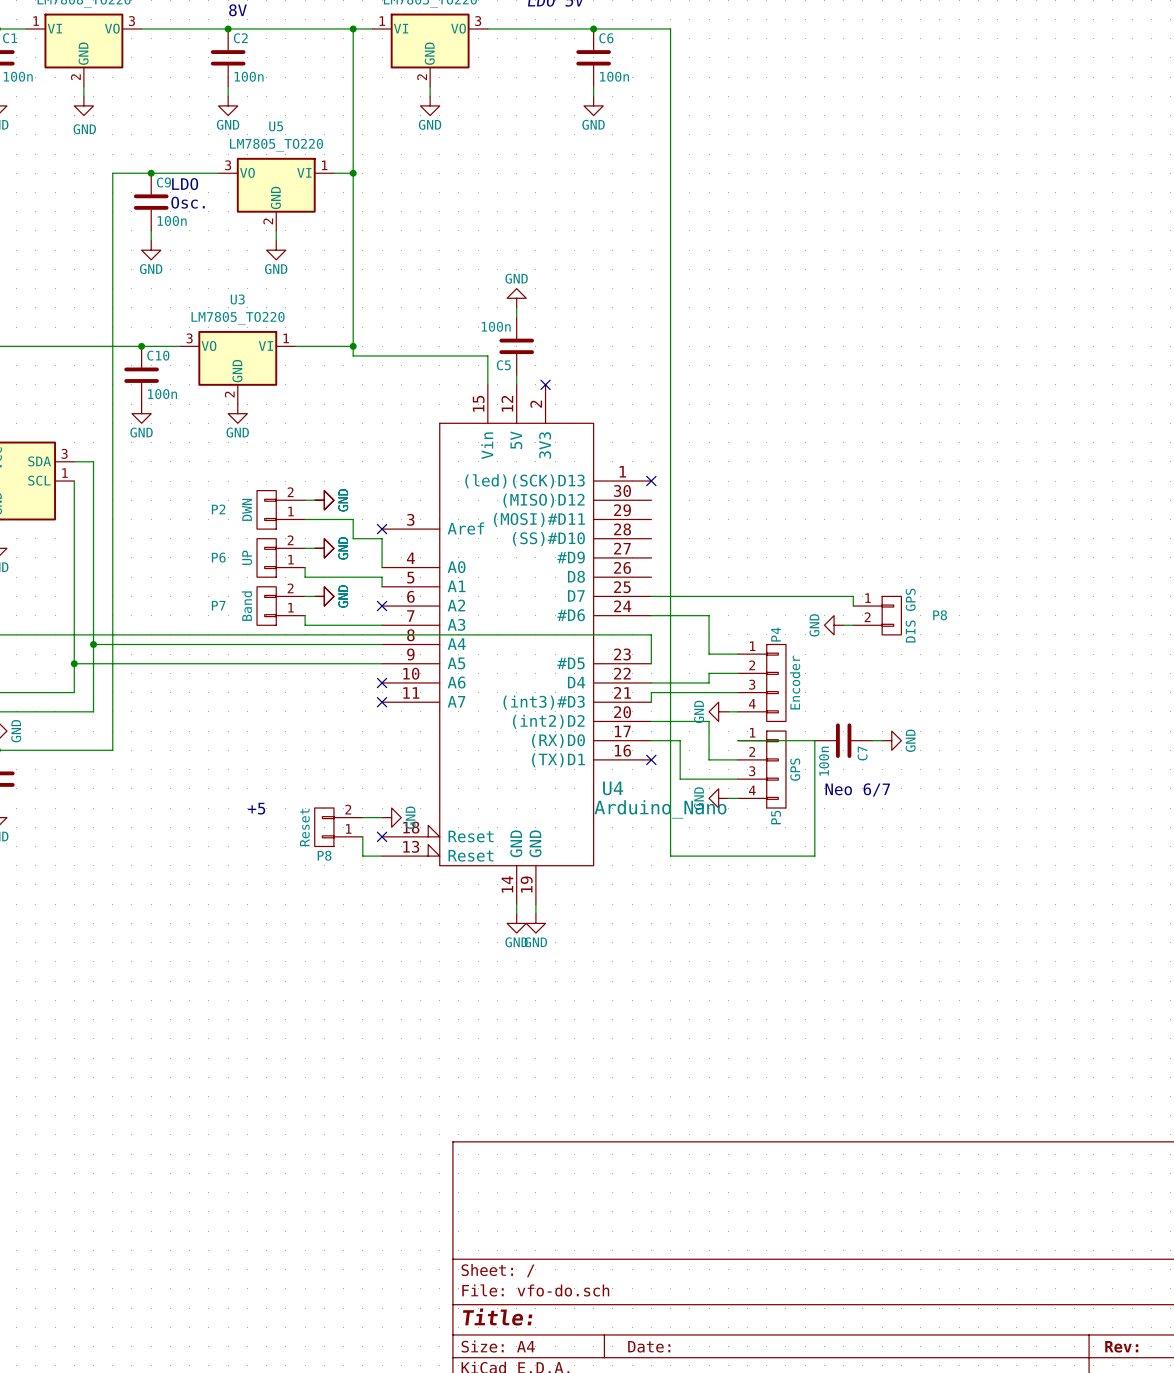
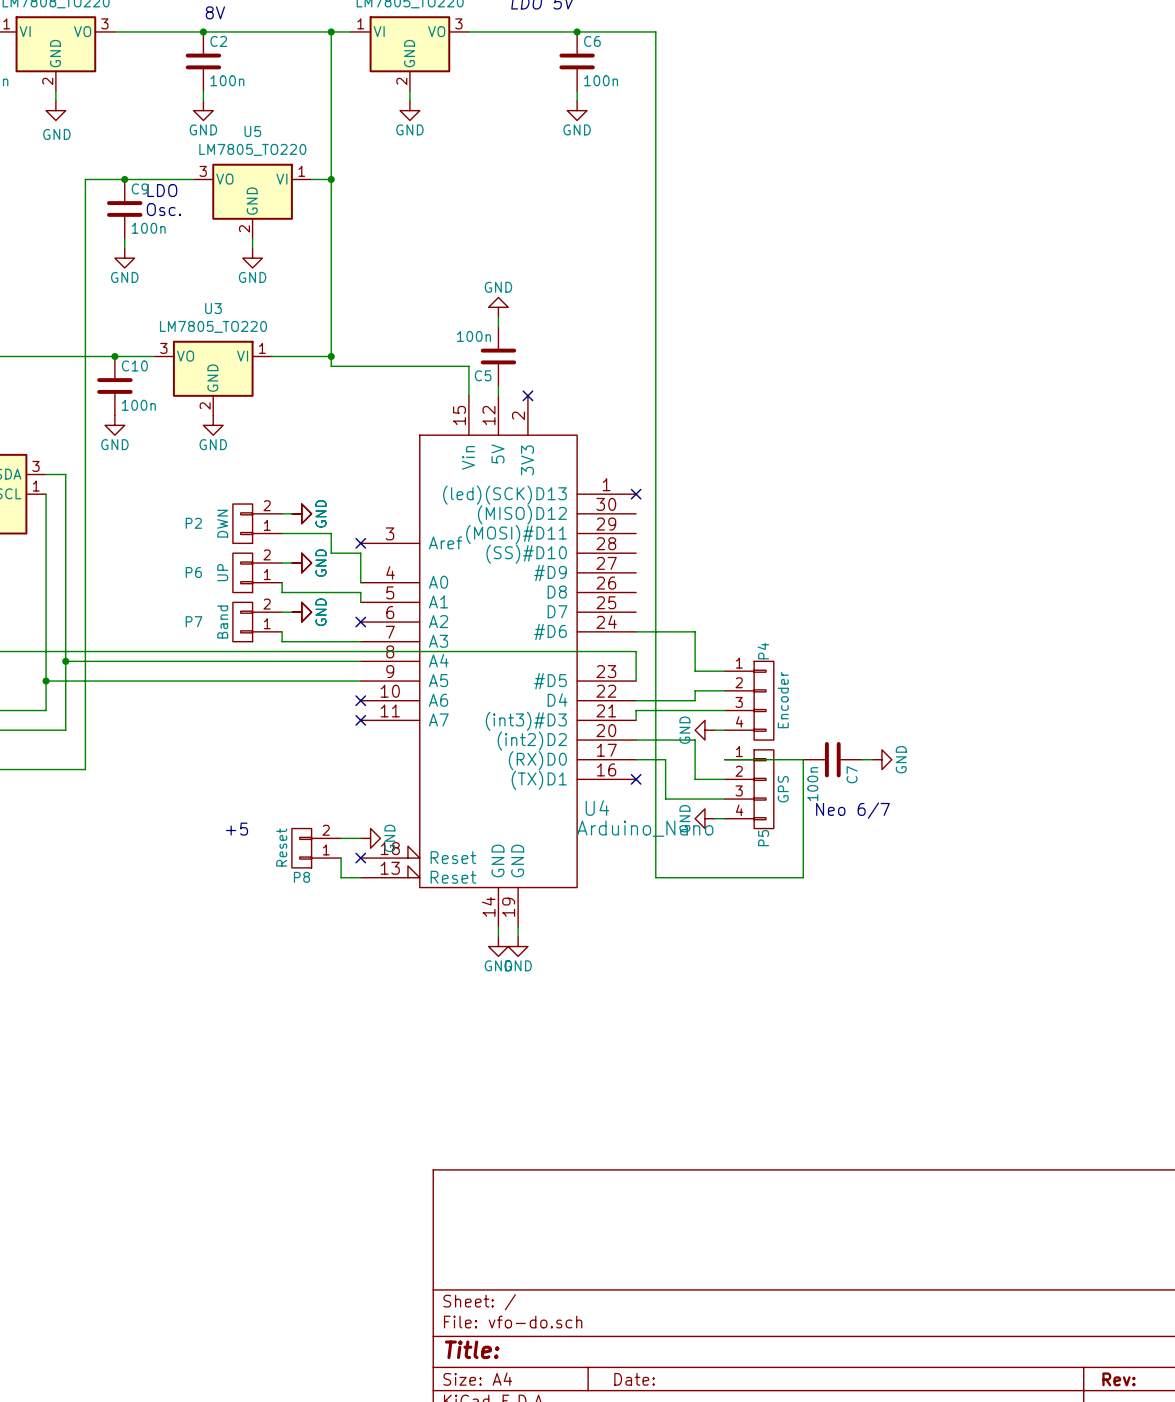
wire: (651, 596) (853, 596) (853, 606) -> none
P8: DIS GPS (877, 615) -> none
power symbol: GND (834, 625) -> none
wire: (843, 625) (853, 625) -> none

